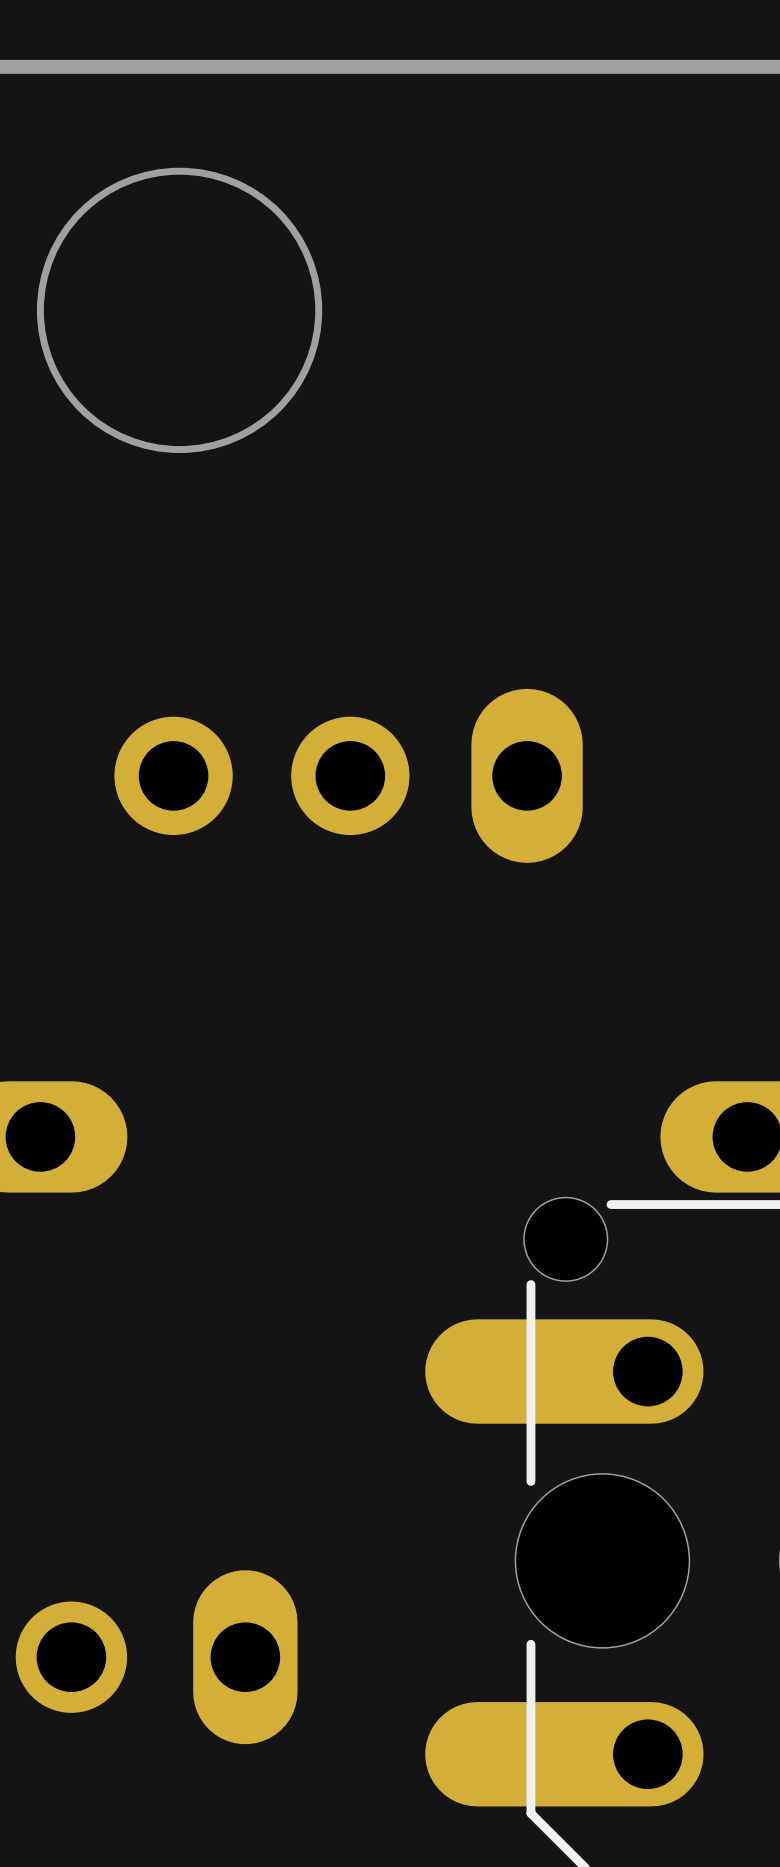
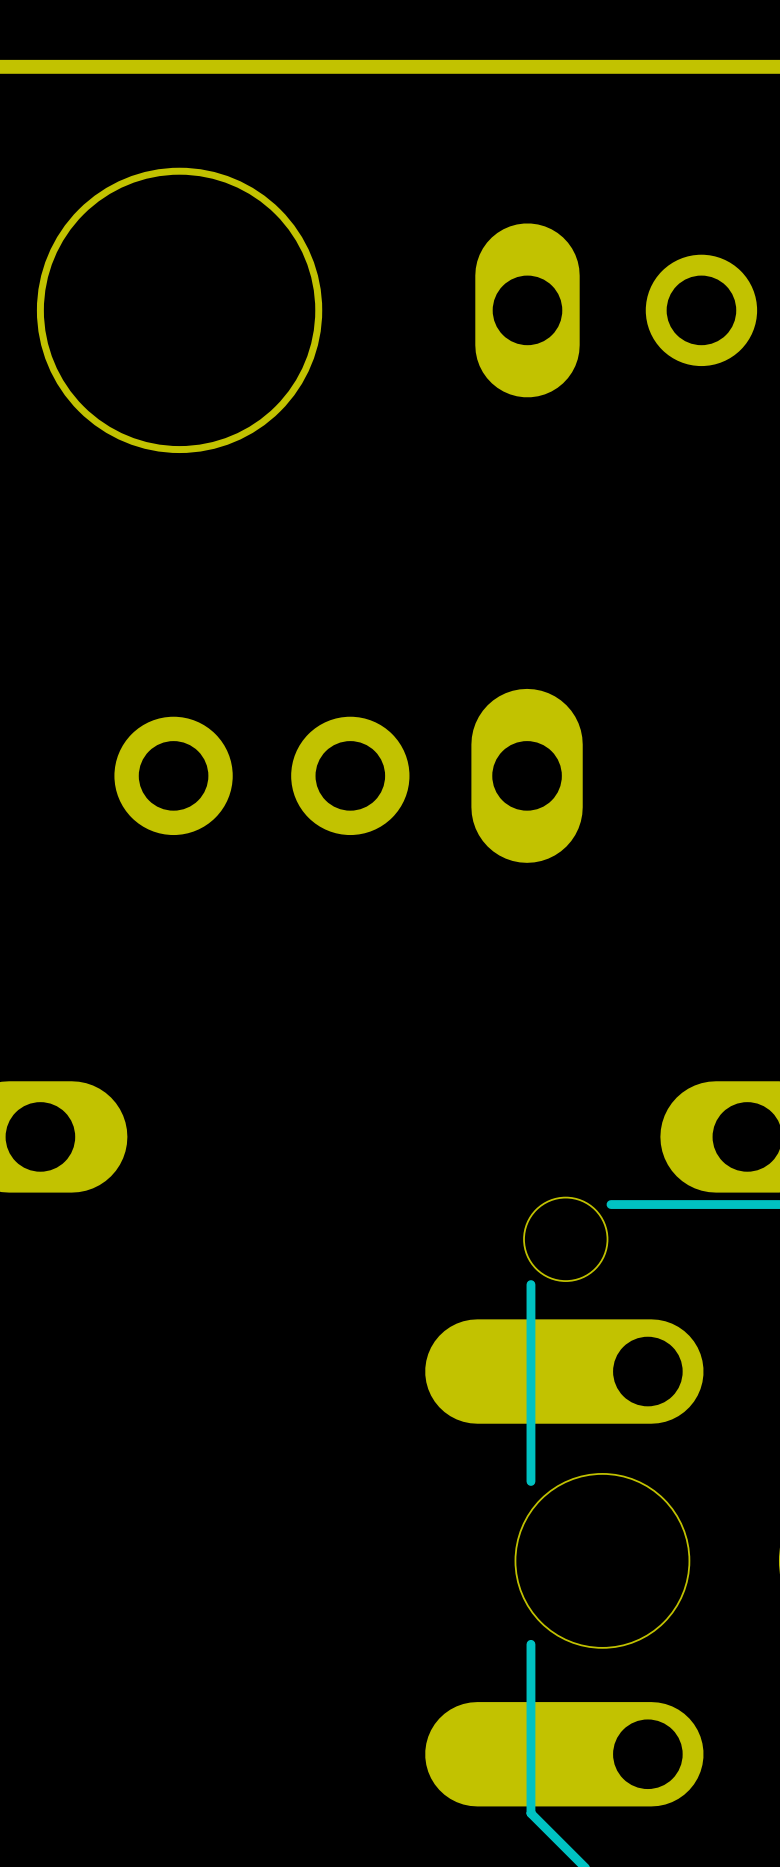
part rotation: 0° (156, 1657) -> 180° (616, 310)
part position: (156, 1657) -> (616, 310)

